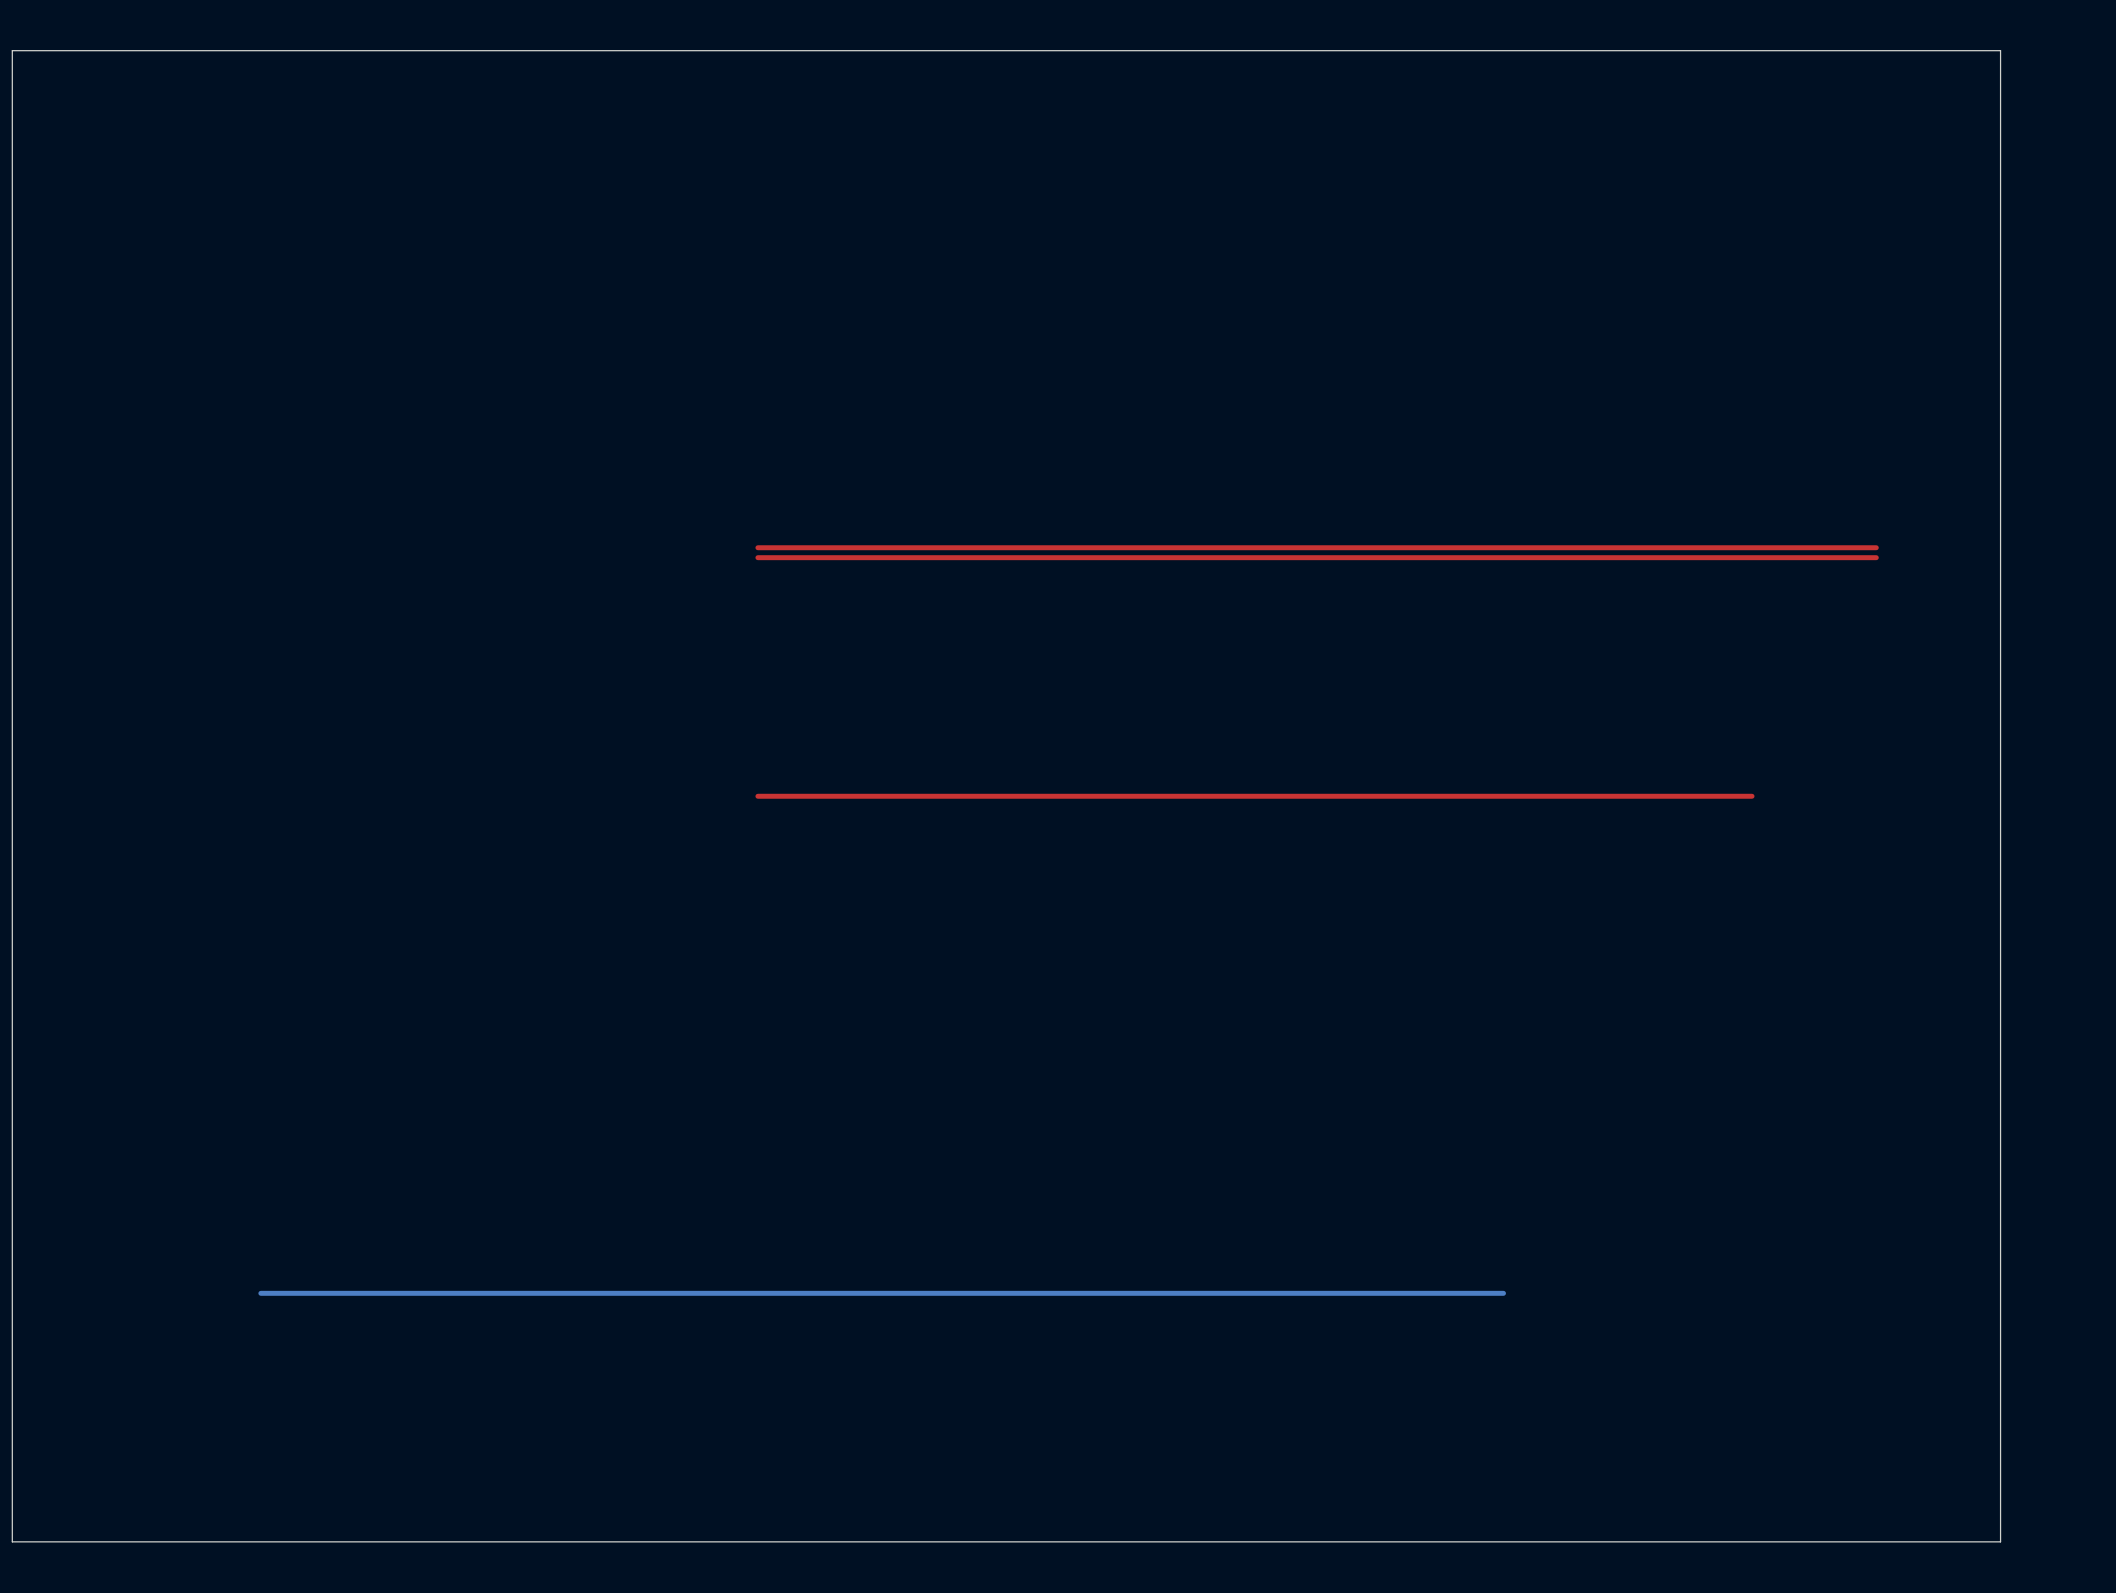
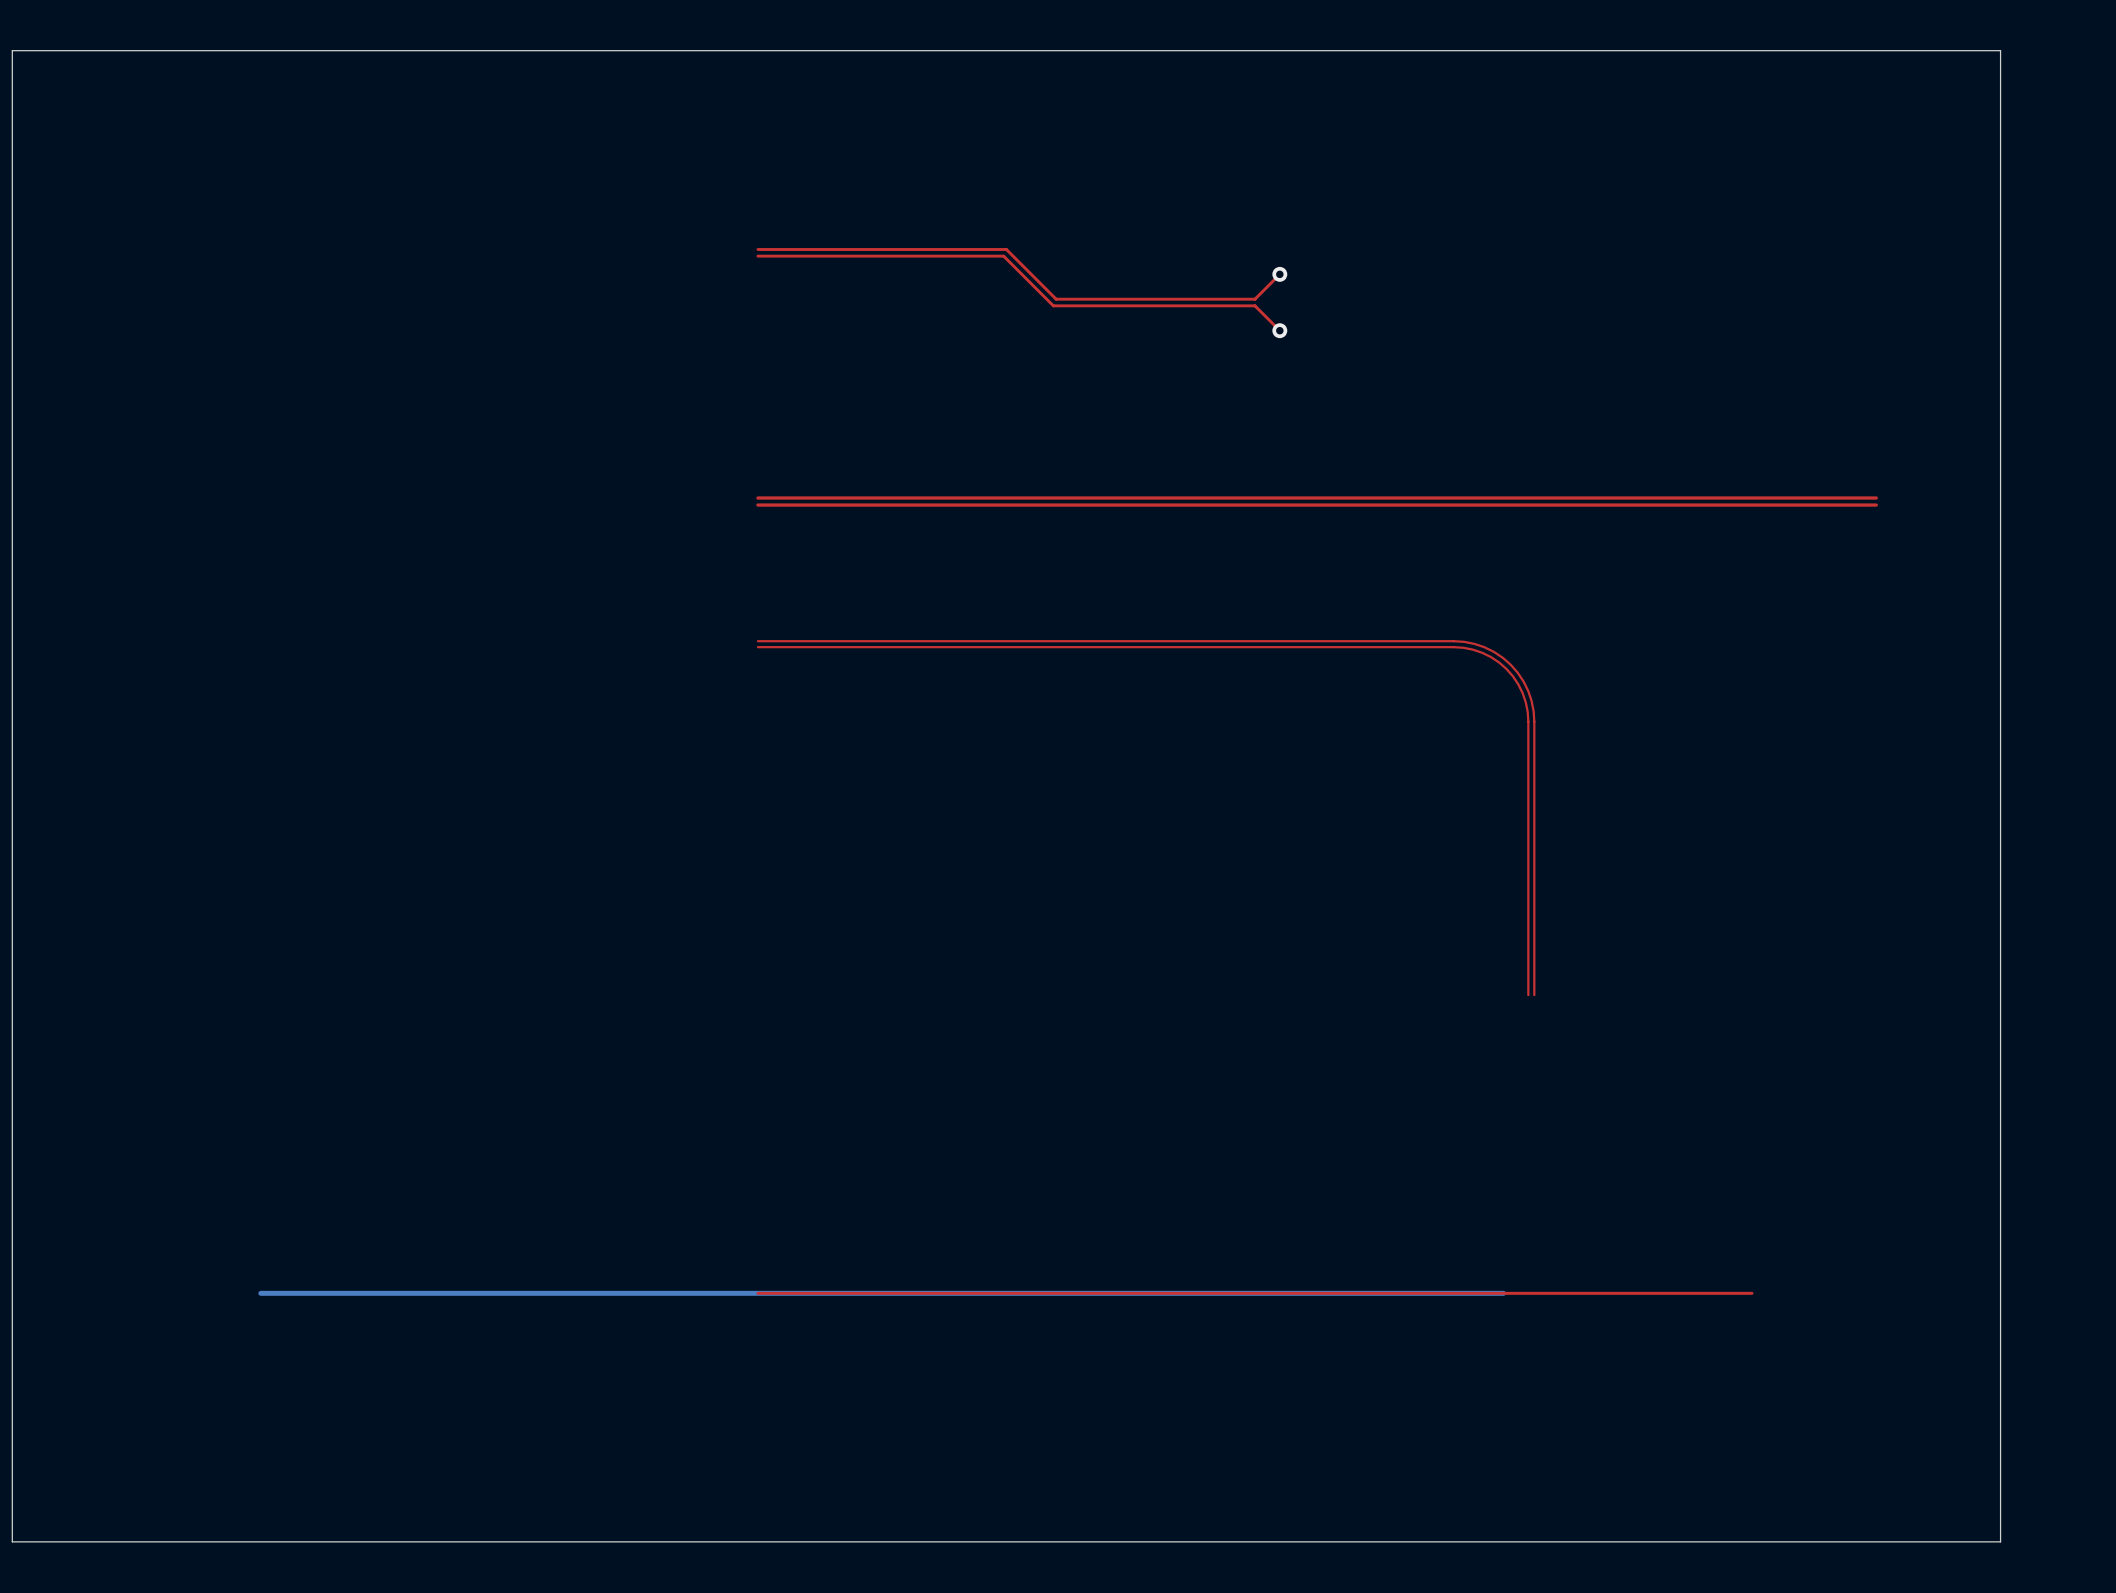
top track: none -> (757, 249) (1006, 249) (1056, 299) (1254, 299) (1279, 274)
top track: none -> (757, 256) (1003, 256) (1053, 305) (1254, 305) (1279, 330)
via: none -> (1279, 274)
via: none -> (1279, 330)
top track: (757, 547) (1876, 547) -> (757, 505) (1876, 505)
top track: (757, 557) (1876, 557) -> (757, 498) (1876, 498)
top track: none -> (757, 641) (1453, 641) (1484, 647) (1502, 657) (1517, 672) (1528, 690) (1533, 711) (1534, 995)
top track: none -> (757, 647) (1453, 647) (1482, 652) (1499, 662) (1512, 676) (1522, 693) (1527, 711) (1528, 995)
top track: (757, 796) (1752, 796) -> (757, 1293) (1752, 1293)

